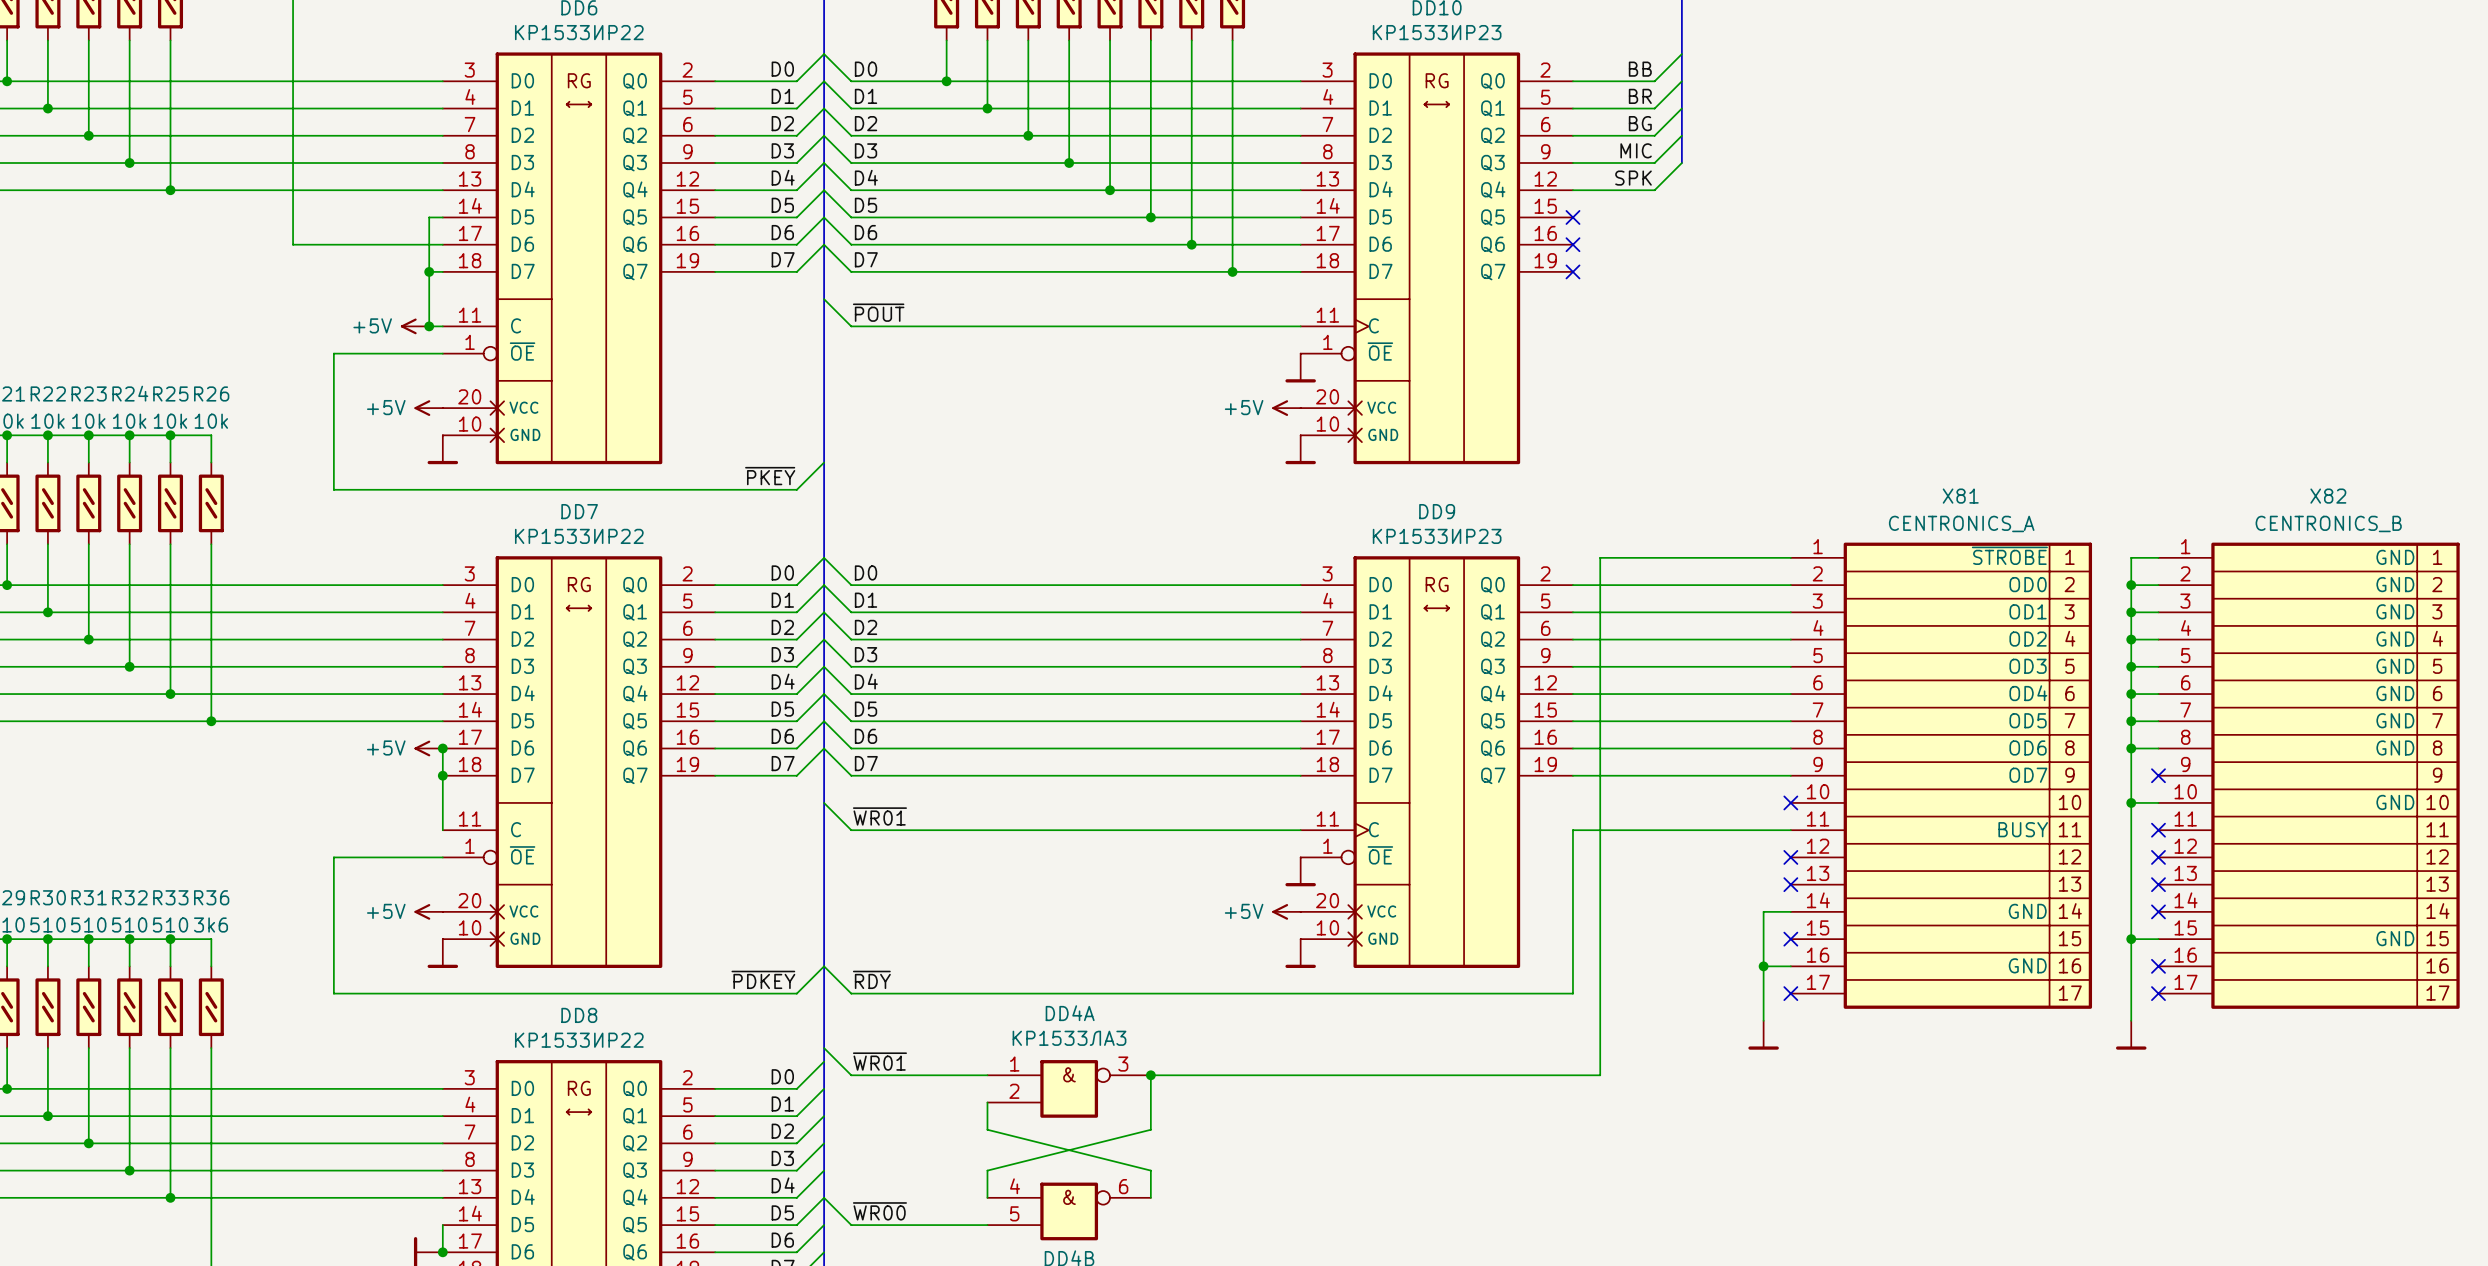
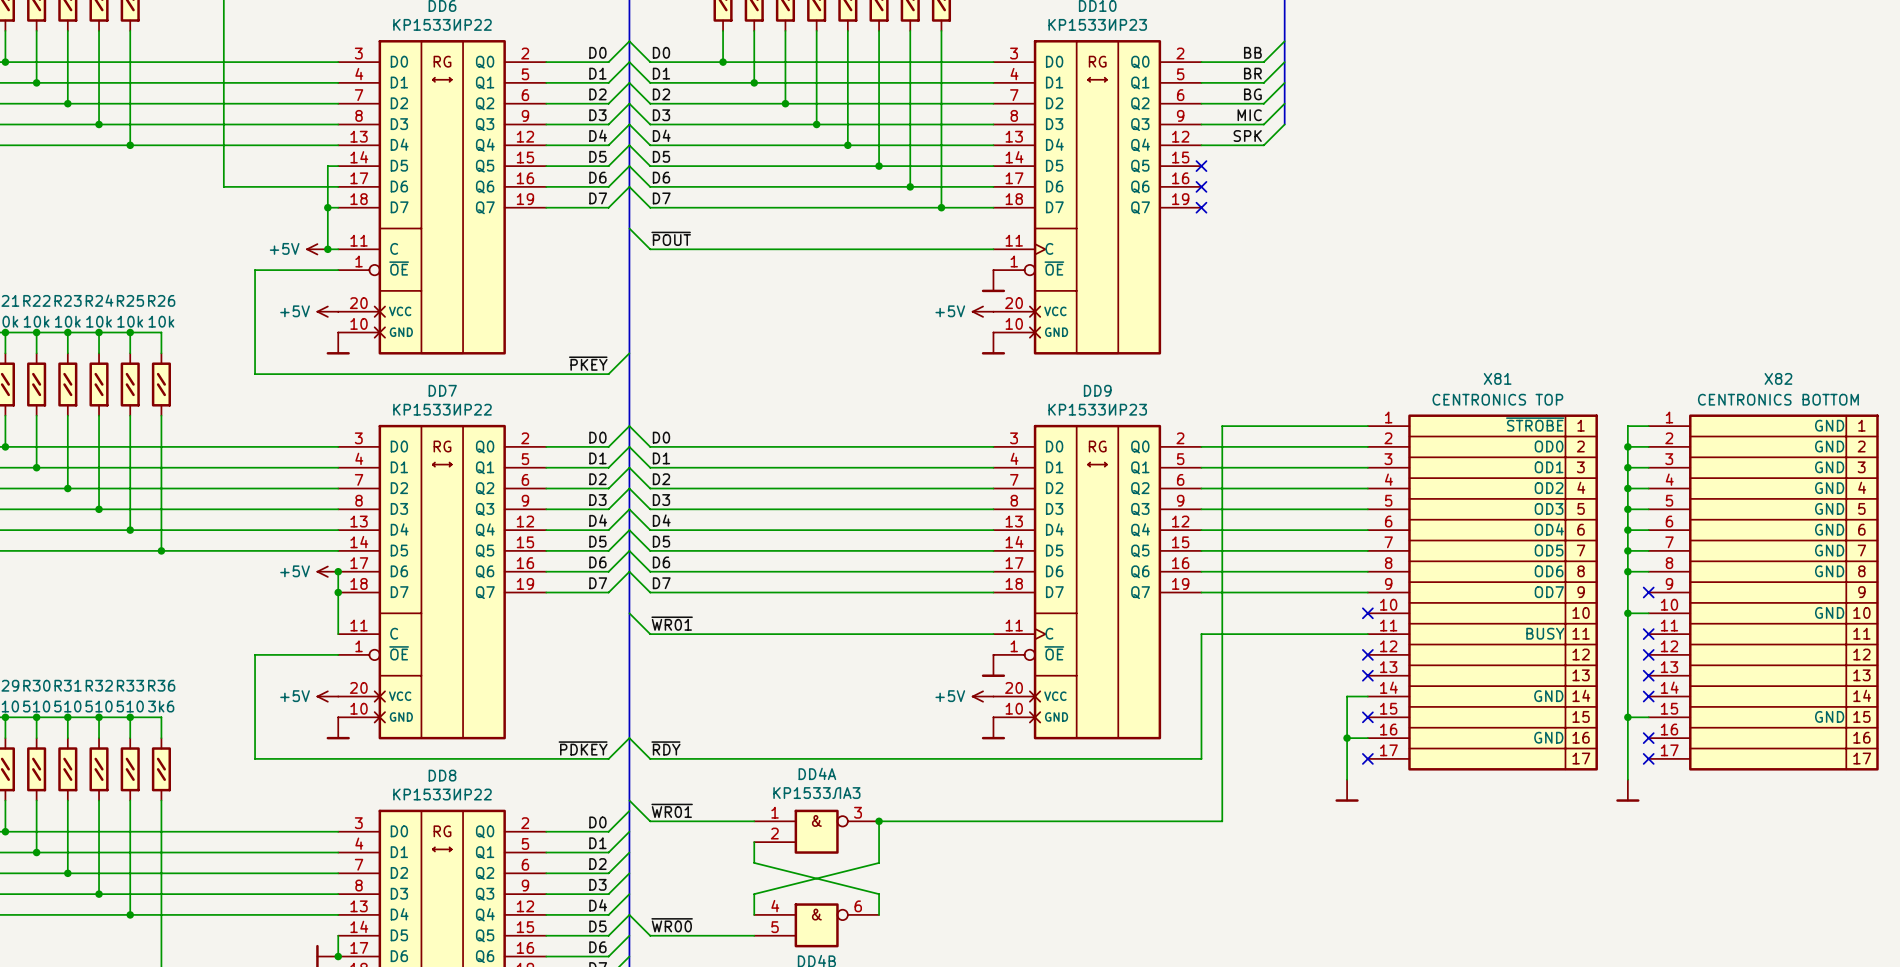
X81 value: CENTRONICS_A (1961, 523) -> CENTRONICS TOP (1497, 399)
X82 value: CENTRONICS_B (2328, 523) -> CENTRONICS BOTTOM (1778, 399)

